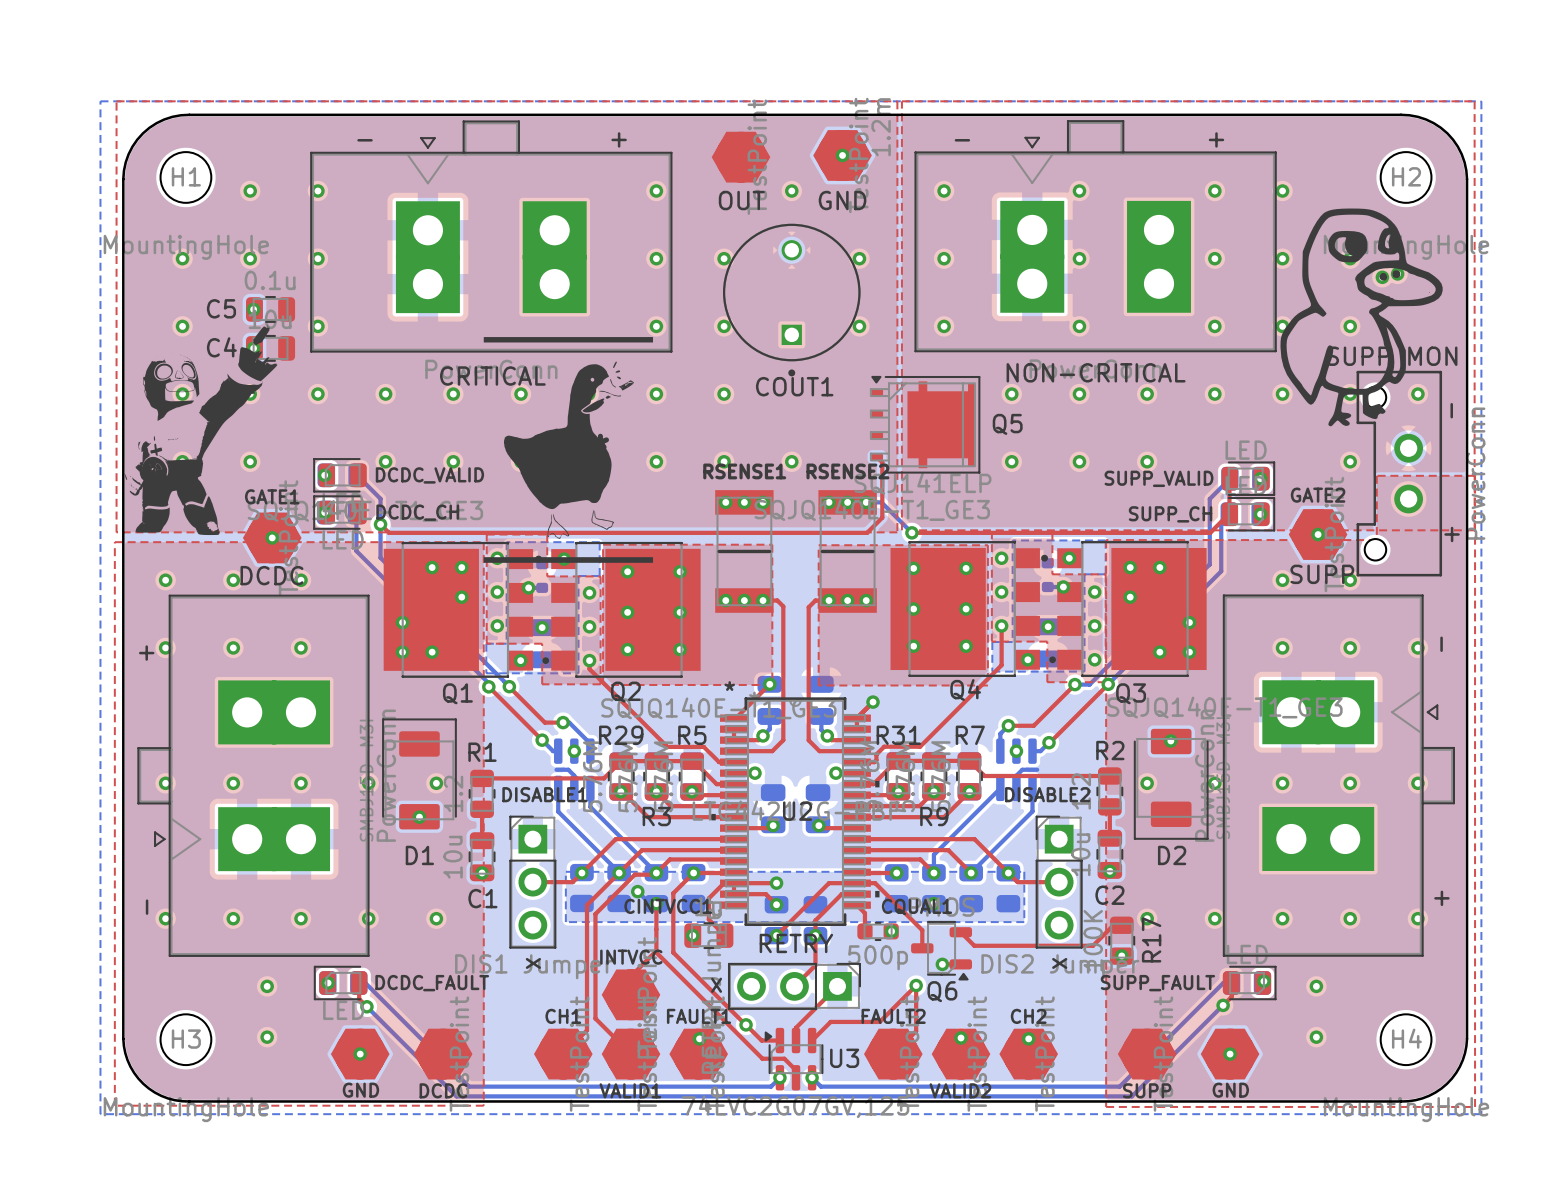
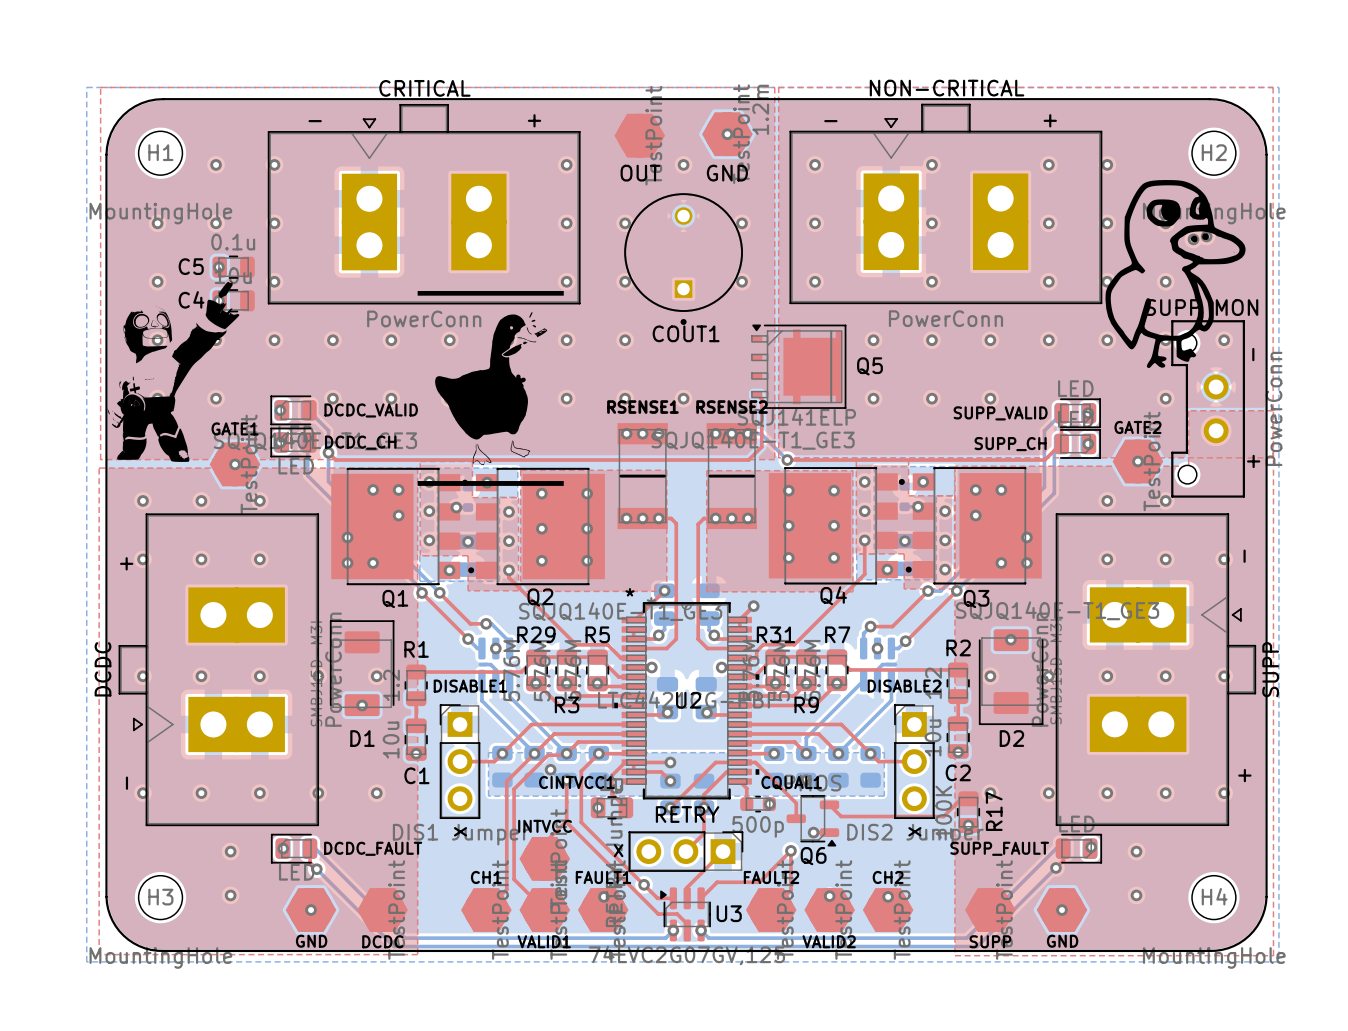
NON-CRITICAL name position: NON-CRITICAL (1096, 372) -> NON-CRITICAL (947, 88)
CRITICAL name position: CRITICAL (492, 376) -> CRITICAL (424, 88)
SUPP name rotation: 0° (1322, 574) -> 90° counterclockwise (1270, 669)
SUPP name position: SUPP (1322, 574) -> SUPP (1270, 669)
DCDC name rotation: 0° (271, 575) -> 90° counterclockwise (102, 669)
DCDC name position: DCDC (271, 575) -> DCDC (102, 669)

